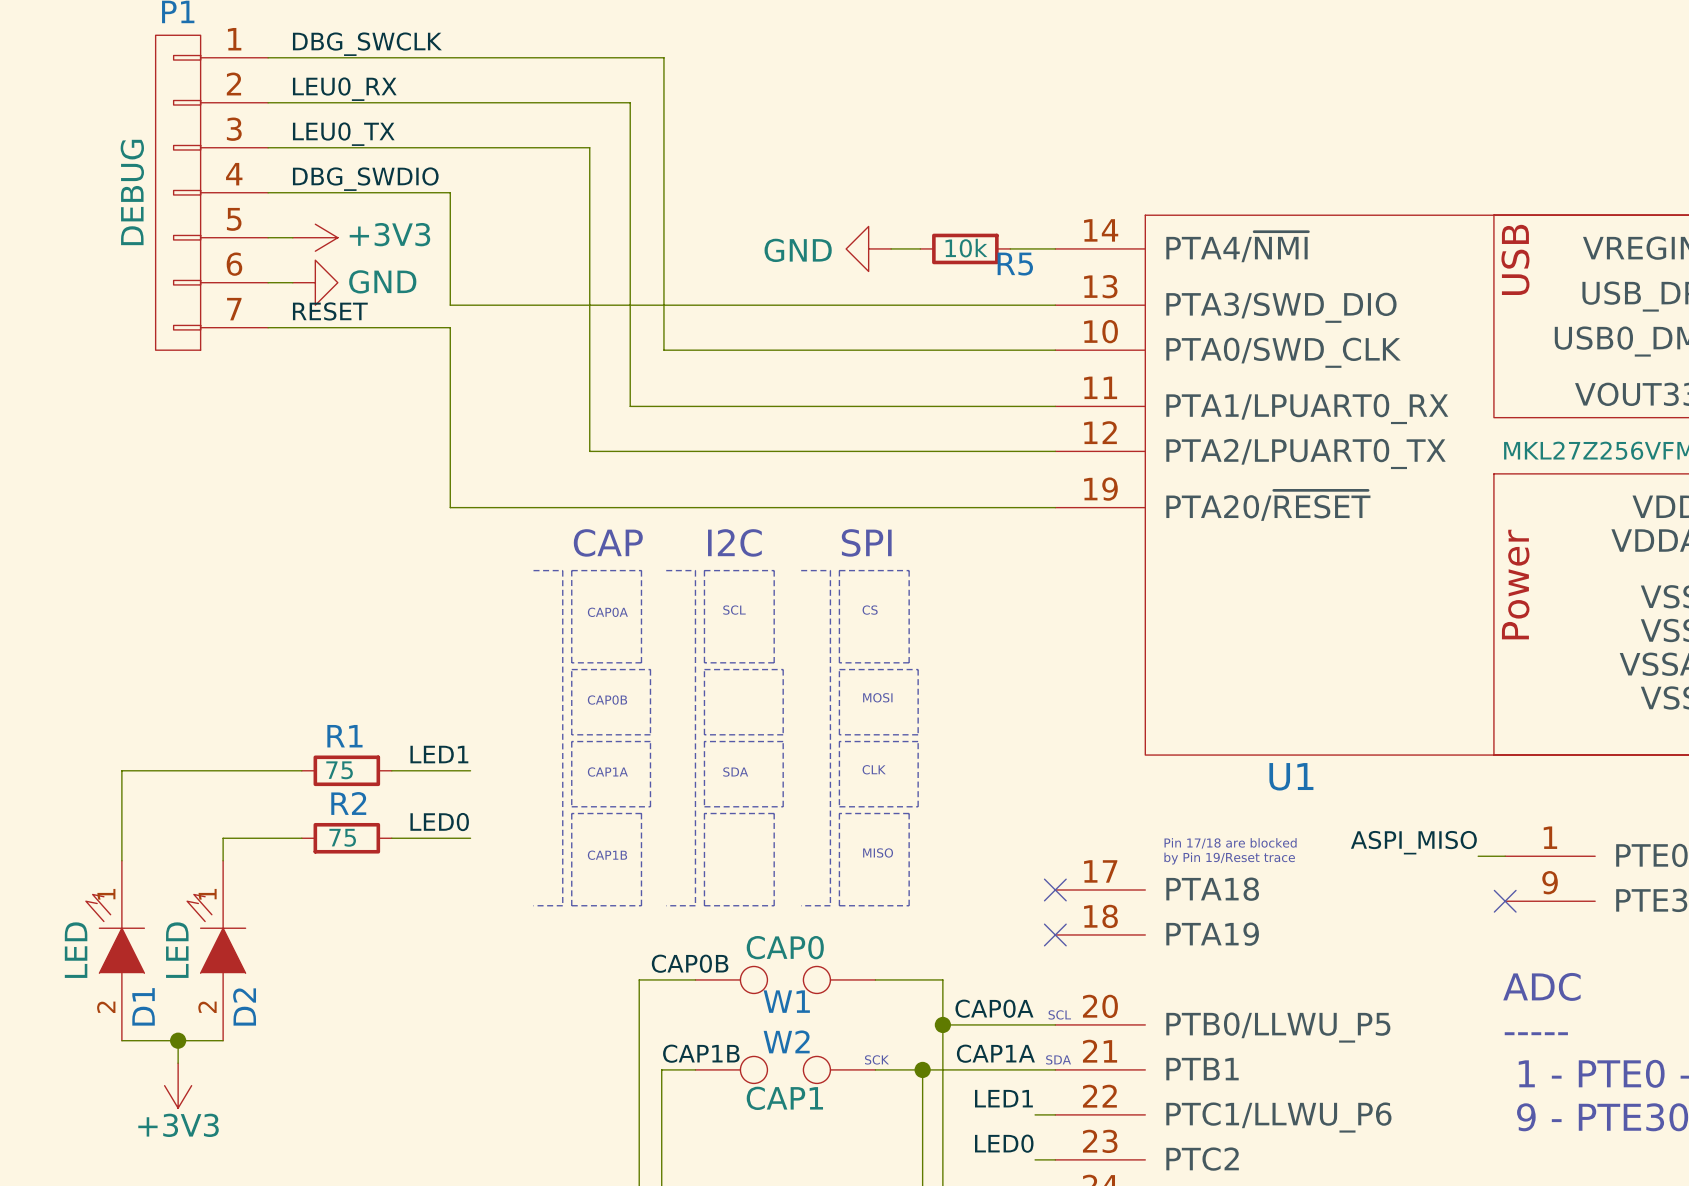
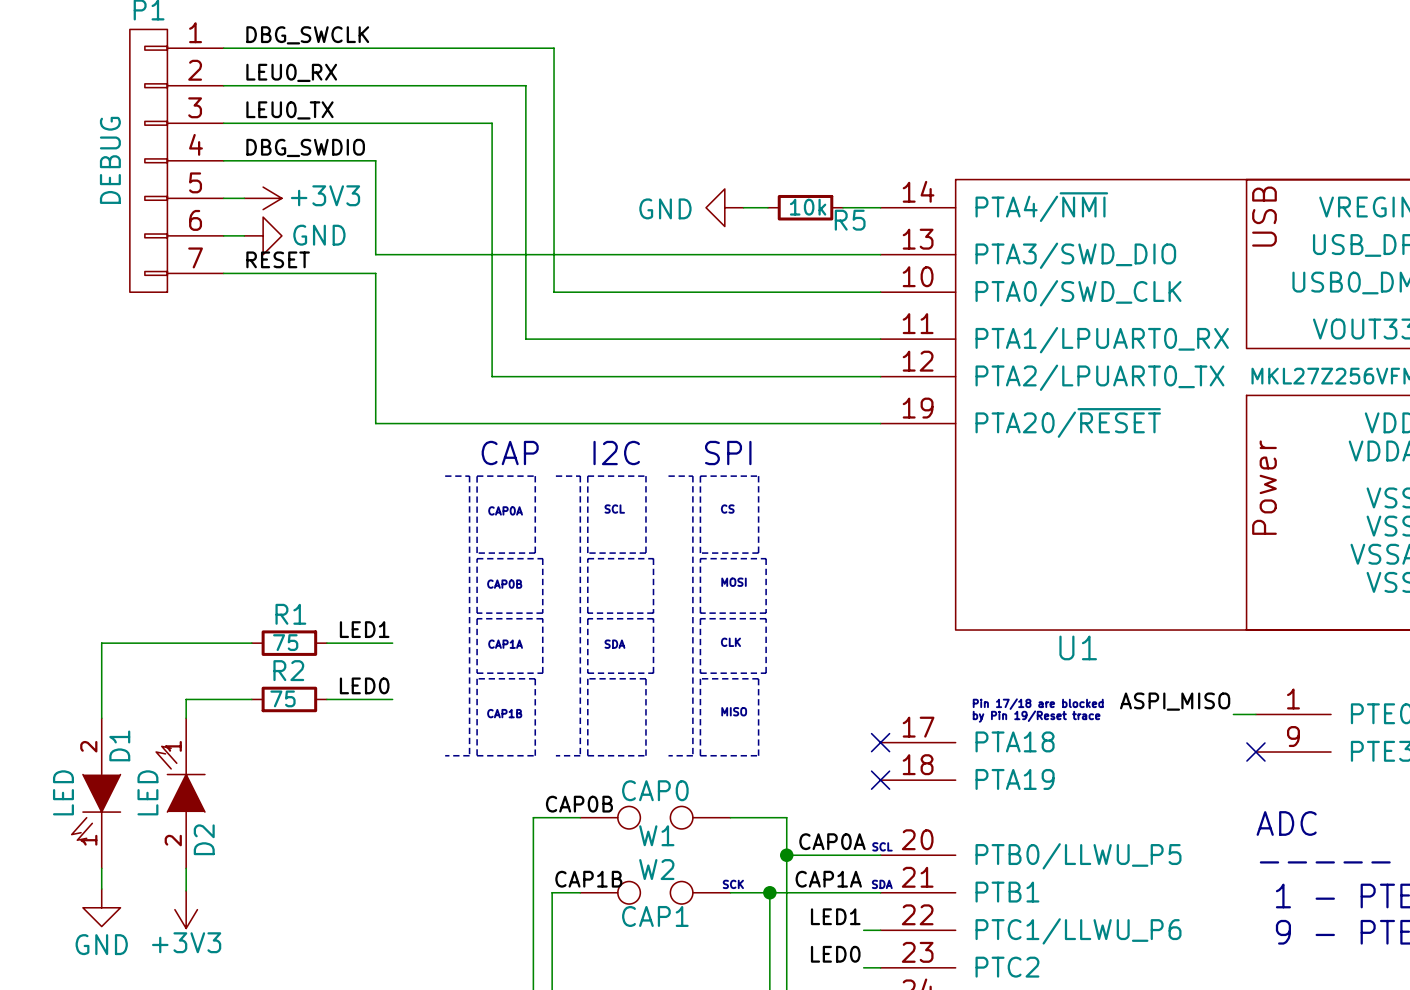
D1 flip: as is (115, 933) -> up-down (96, 807)
wire: (121, 1040) (223, 1040) -> (101, 868) (101, 889)
wire: (178, 1040) (178, 1063) -> none
junction: (178, 1040) -> none
wire: none -> (186, 868) (186, 890)
power symbol position: +3V3 (178, 1085) -> +3V3 (186, 909)
power symbol: none -> GND (101, 907)

